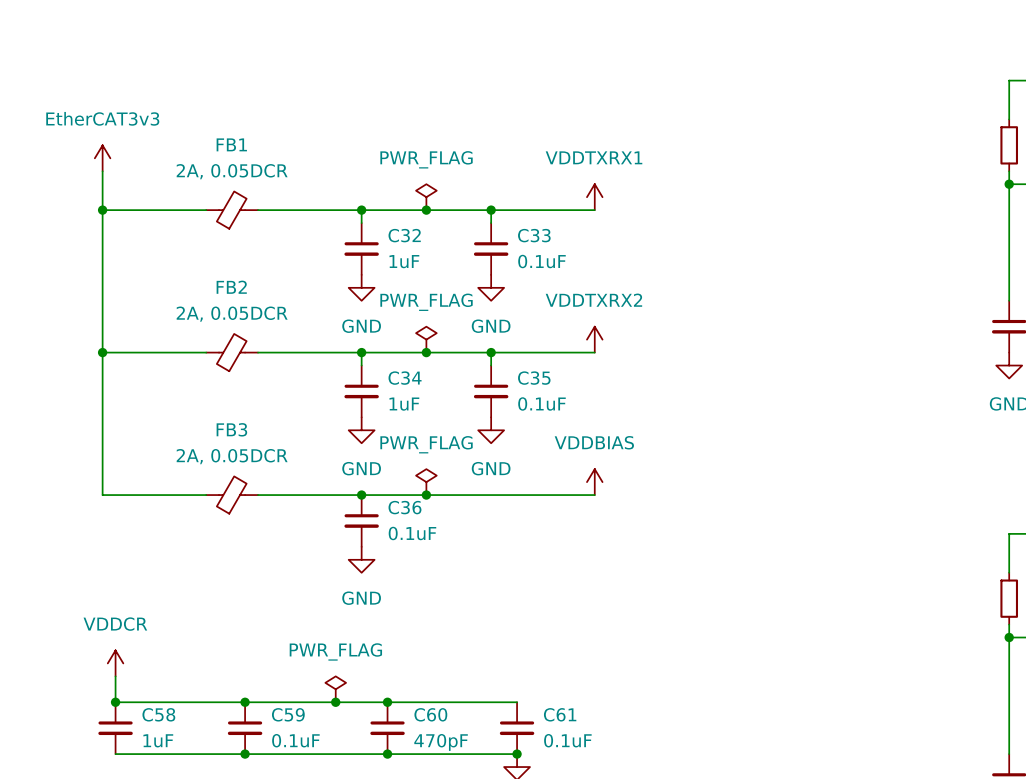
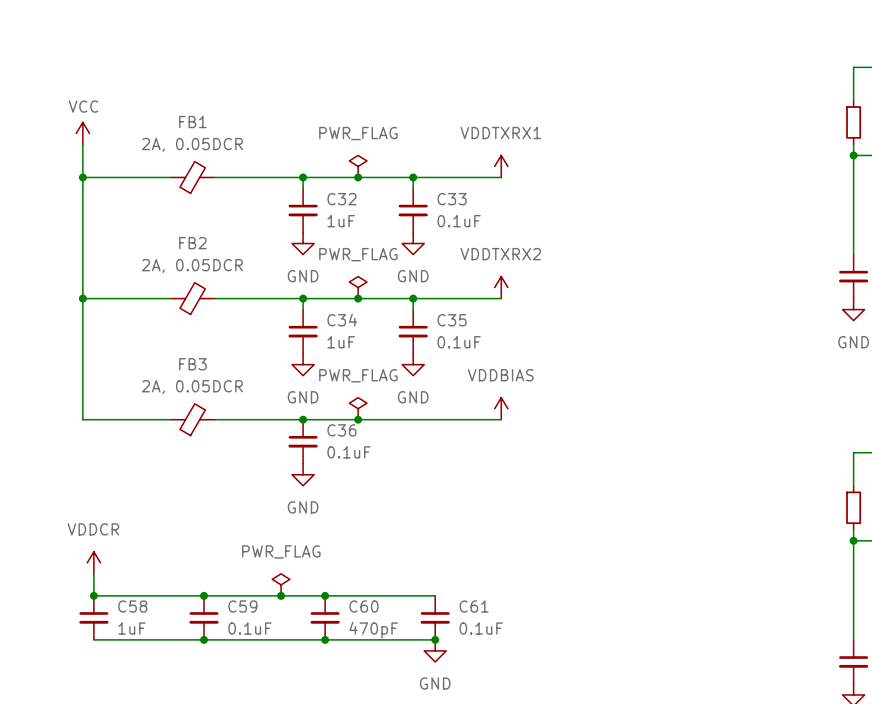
power symbol: EtherCAT3v3 (102, 158) -> VCC (82, 133)

